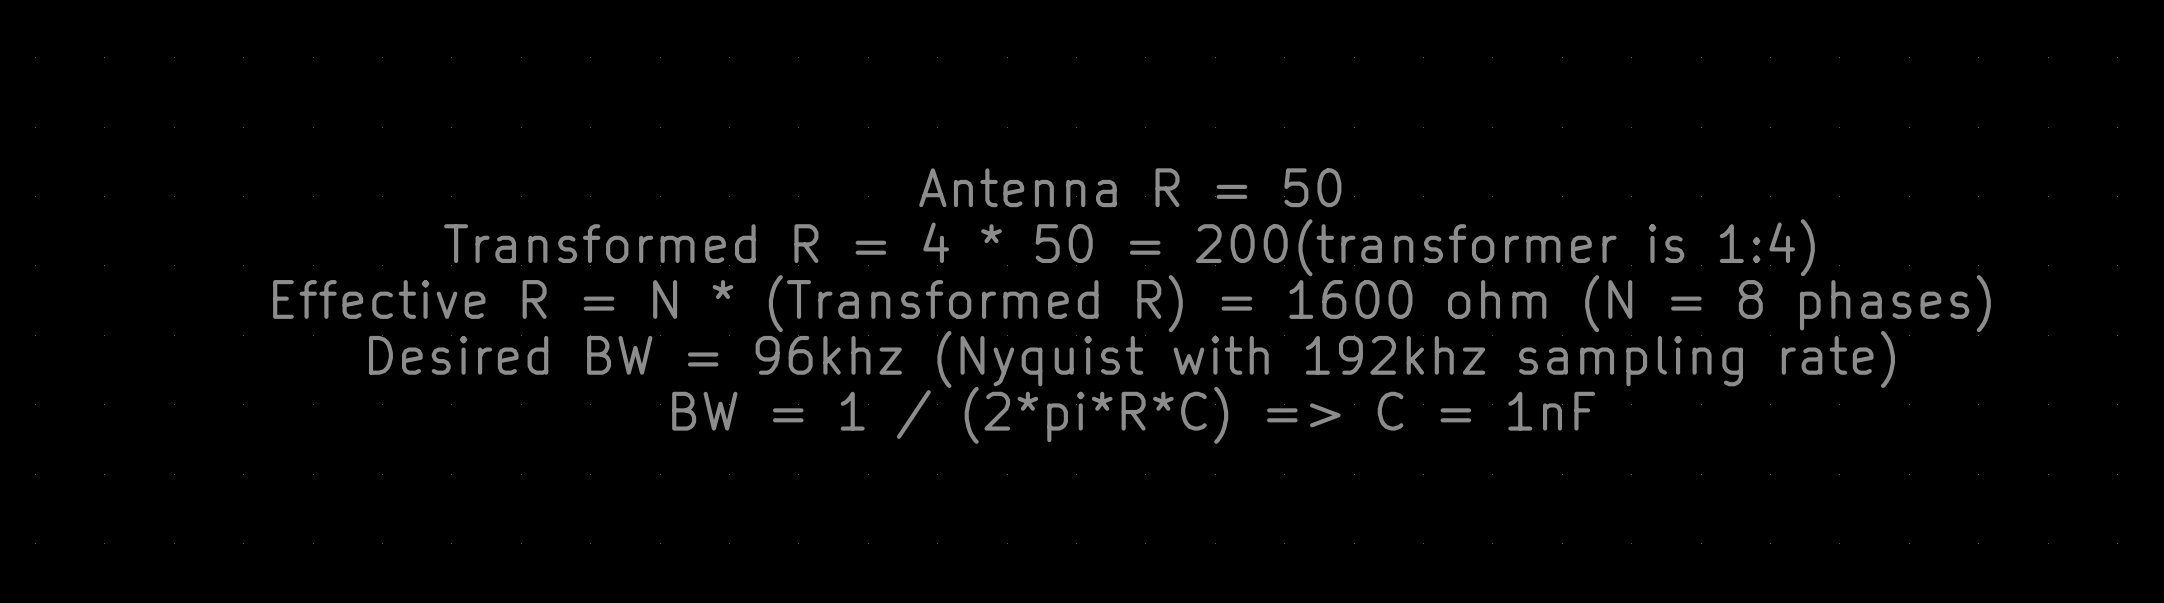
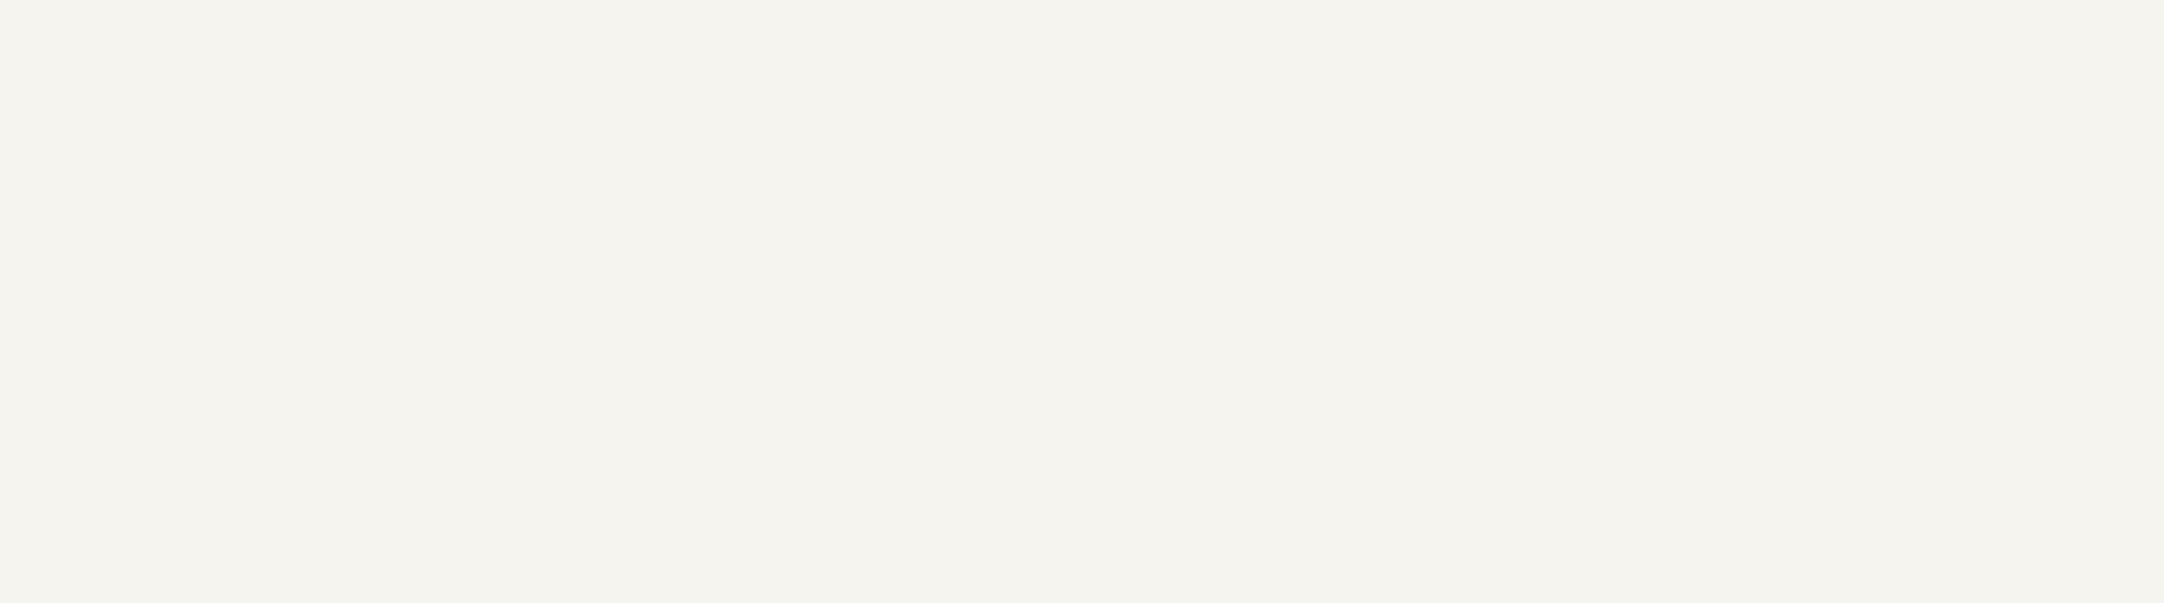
text: Antenna R = 50 (1130, 187) -> none
text: Transformed R = 4 * 50 = 200(transformer is 1:4) (1129, 247) -> none
text: Effective R = N * (Transformed R) = 1600 ohm (N = 8 phases) (1131, 303) -> none
text: Desired BW = 96khz (Nyquist with 192khz sampling rate) (1131, 359) -> none
text: BW = 1 / (2*pi*R*C) => C = 1nF (1133, 415) -> none

